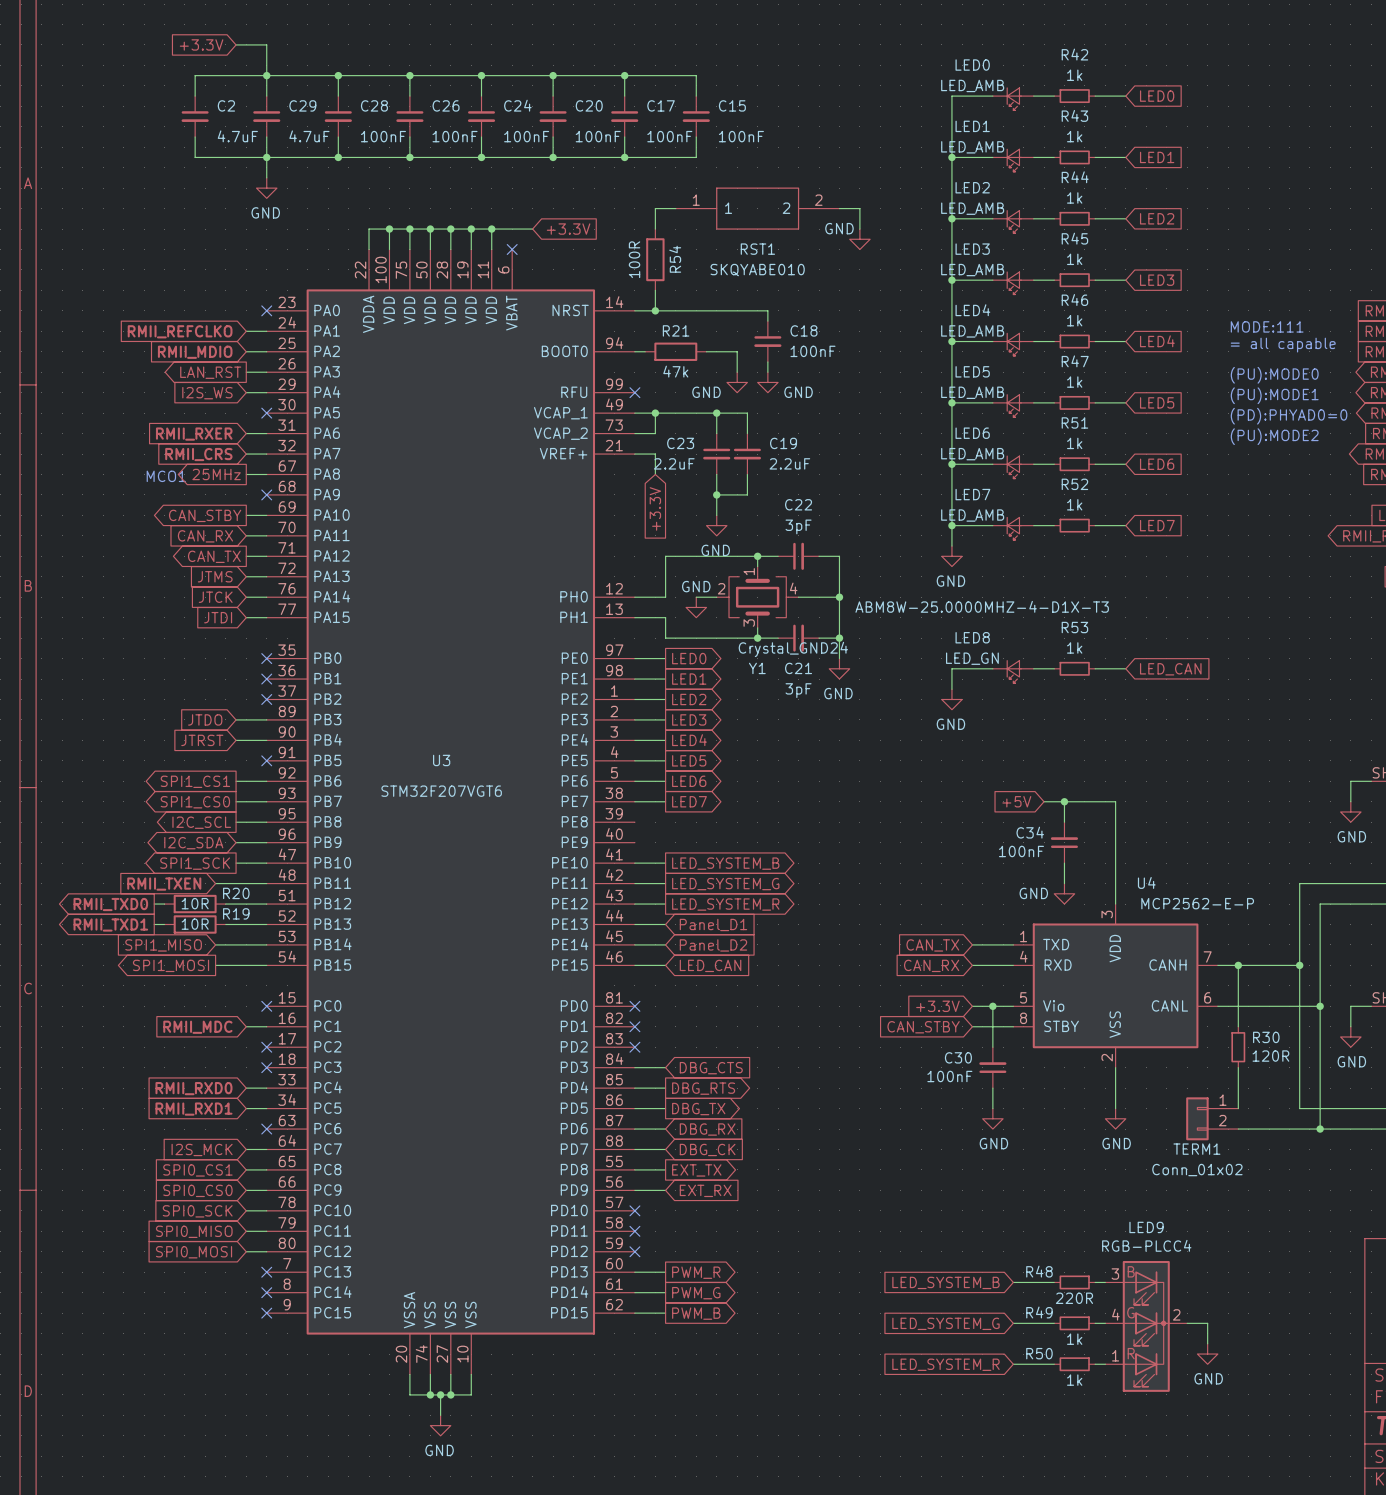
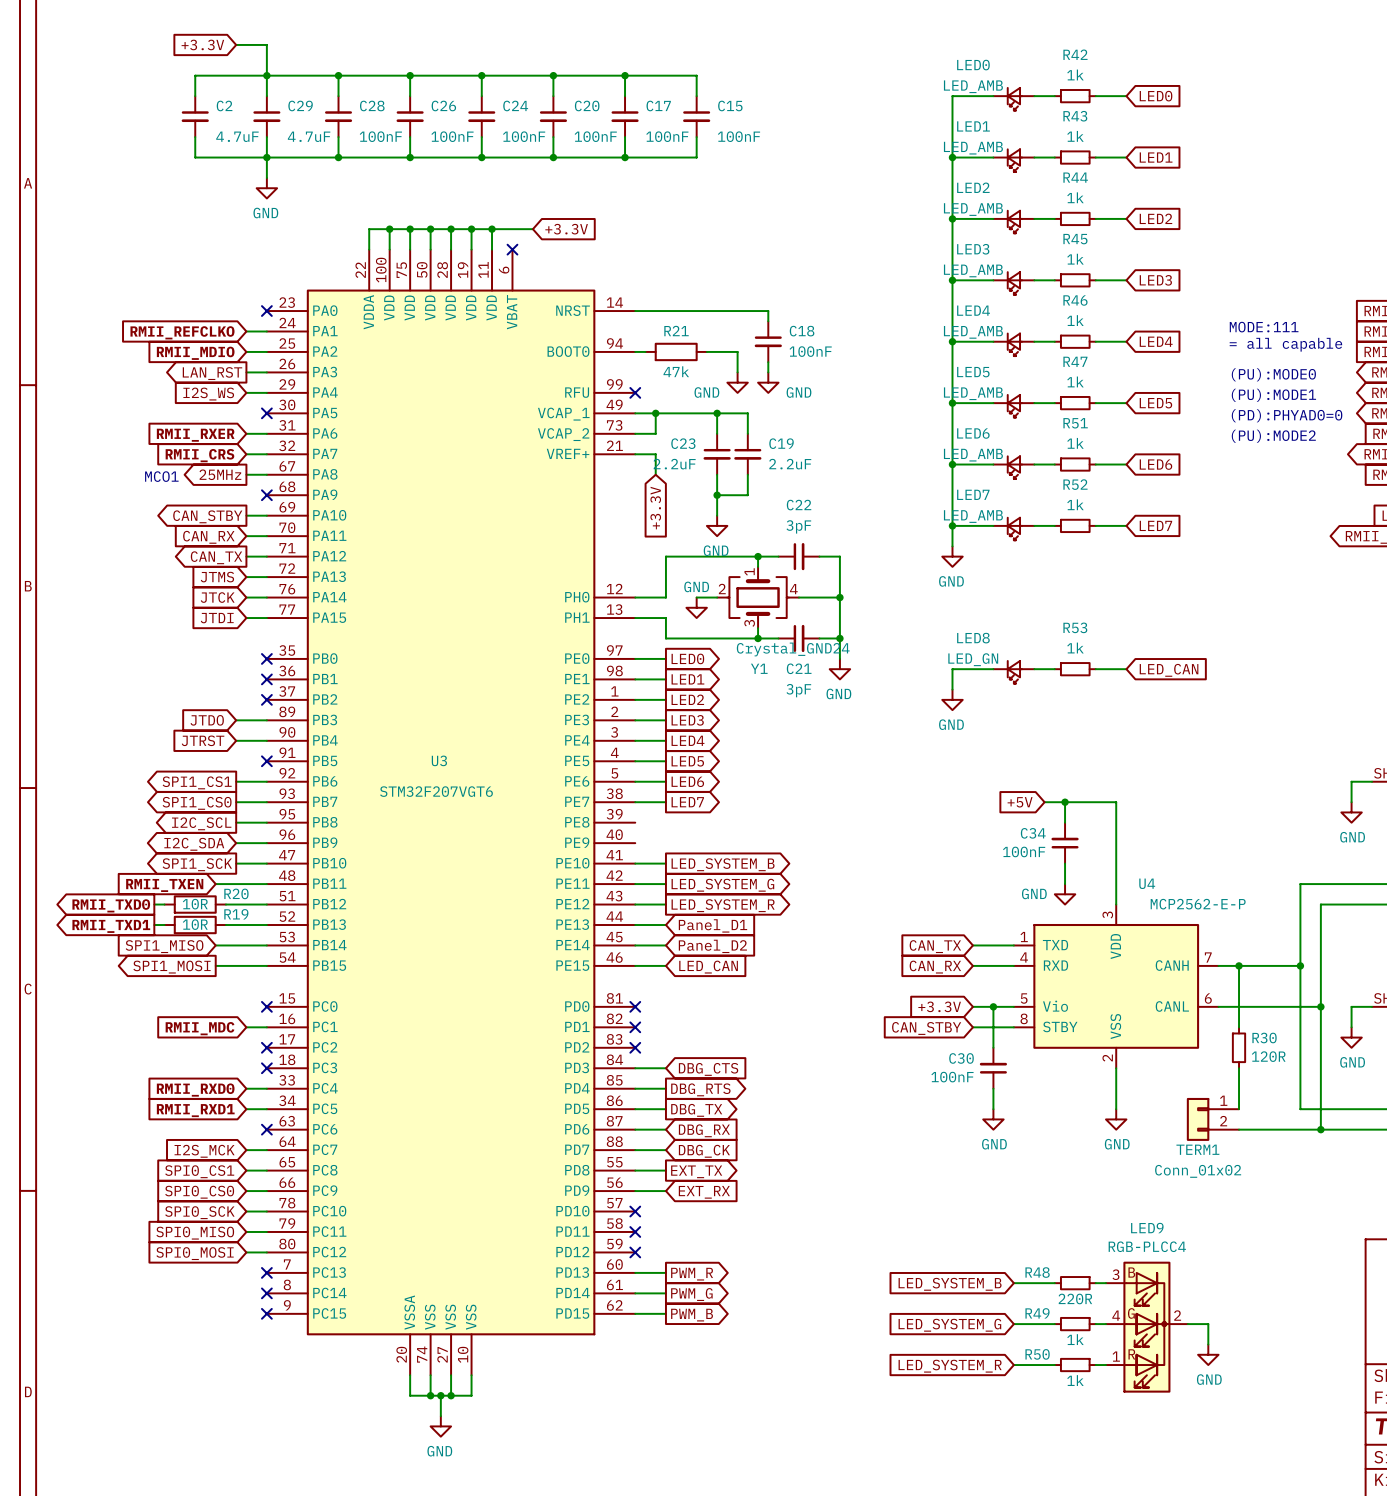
wire: (675, 208) (655, 208) (655, 229) -> none
RST1: SKQYABE010 (757, 208) -> none
wire: (839, 208) (859, 208) (859, 229) -> none
power symbol: GND (859, 239) -> none
R54: 100R (655, 259) -> none
wire: (655, 290) (655, 310) -> none
junction: (655, 310) -> none
Y1 text: ABM8W-25.0000MHZ-4-D1X-T3 (982, 606) -> none

